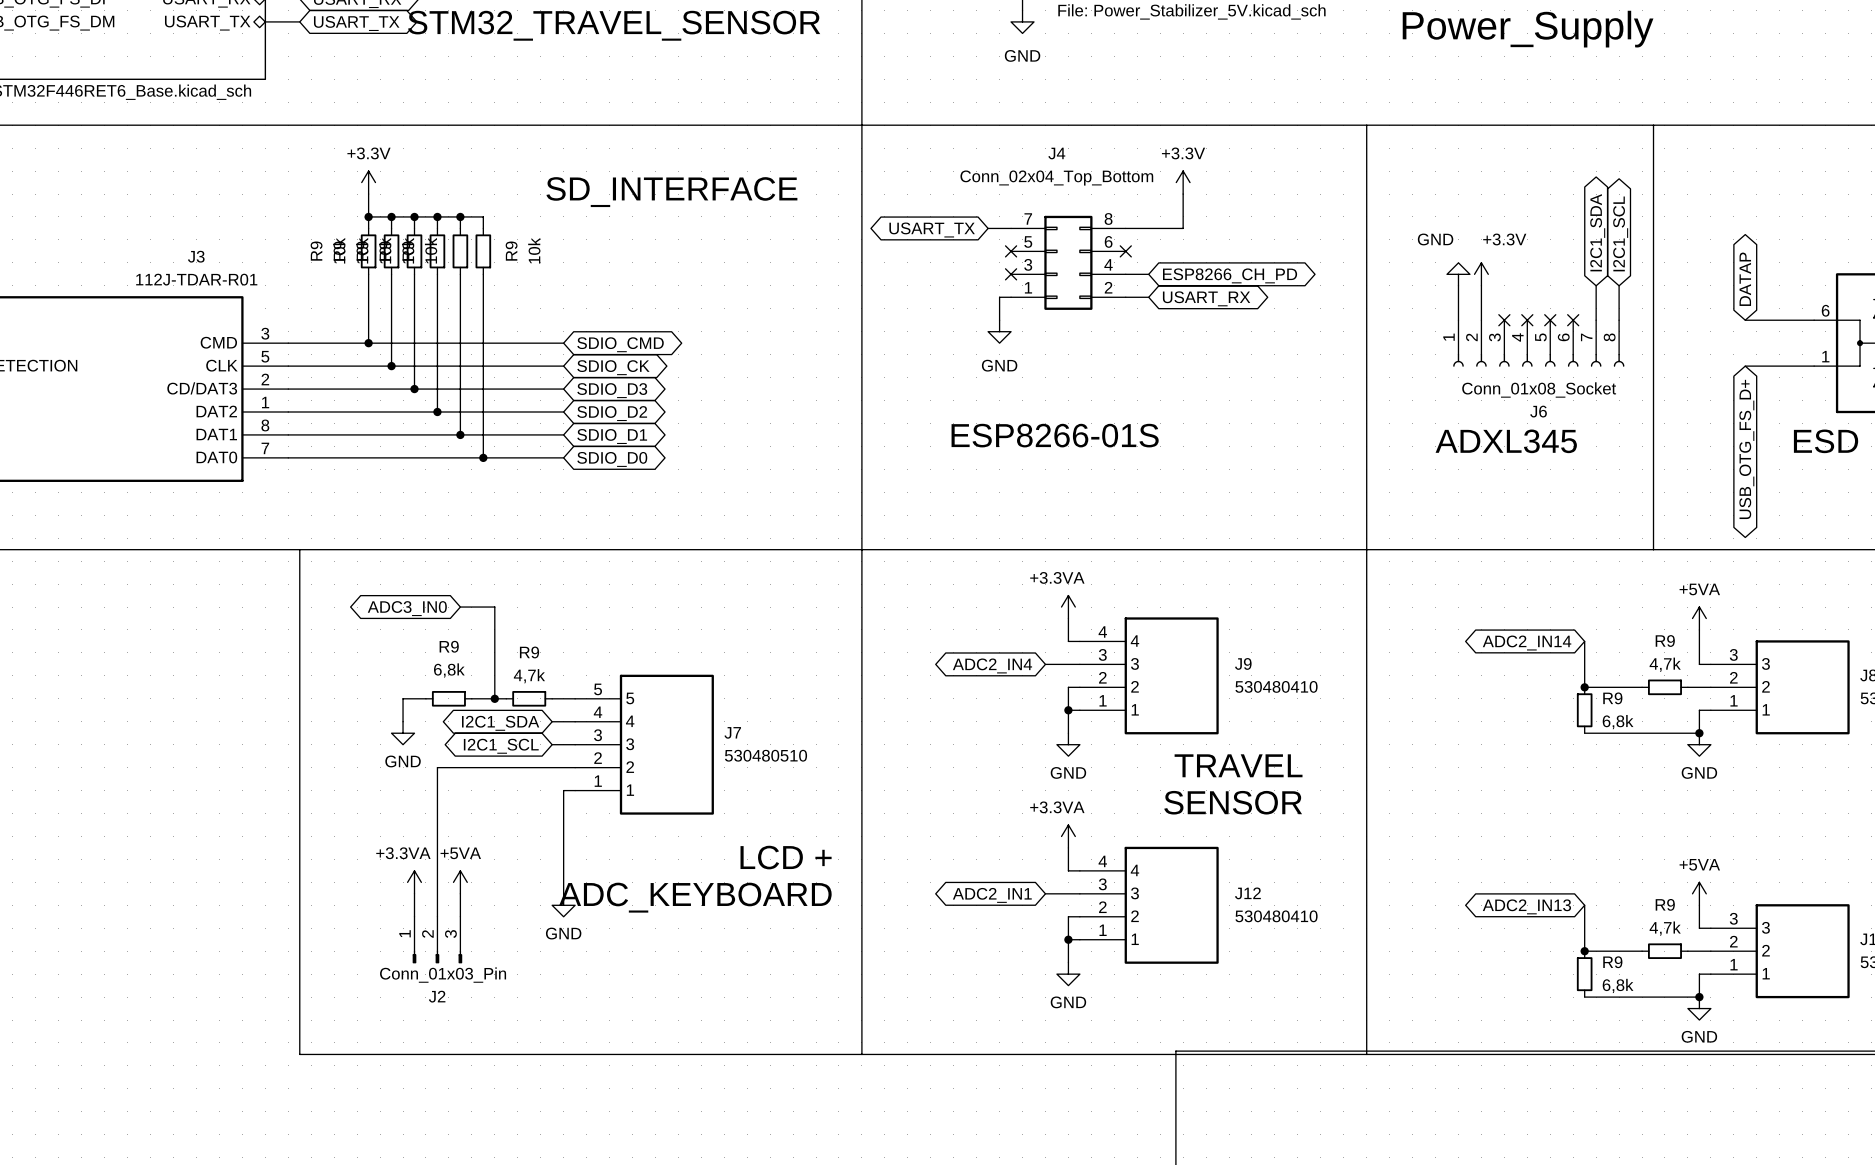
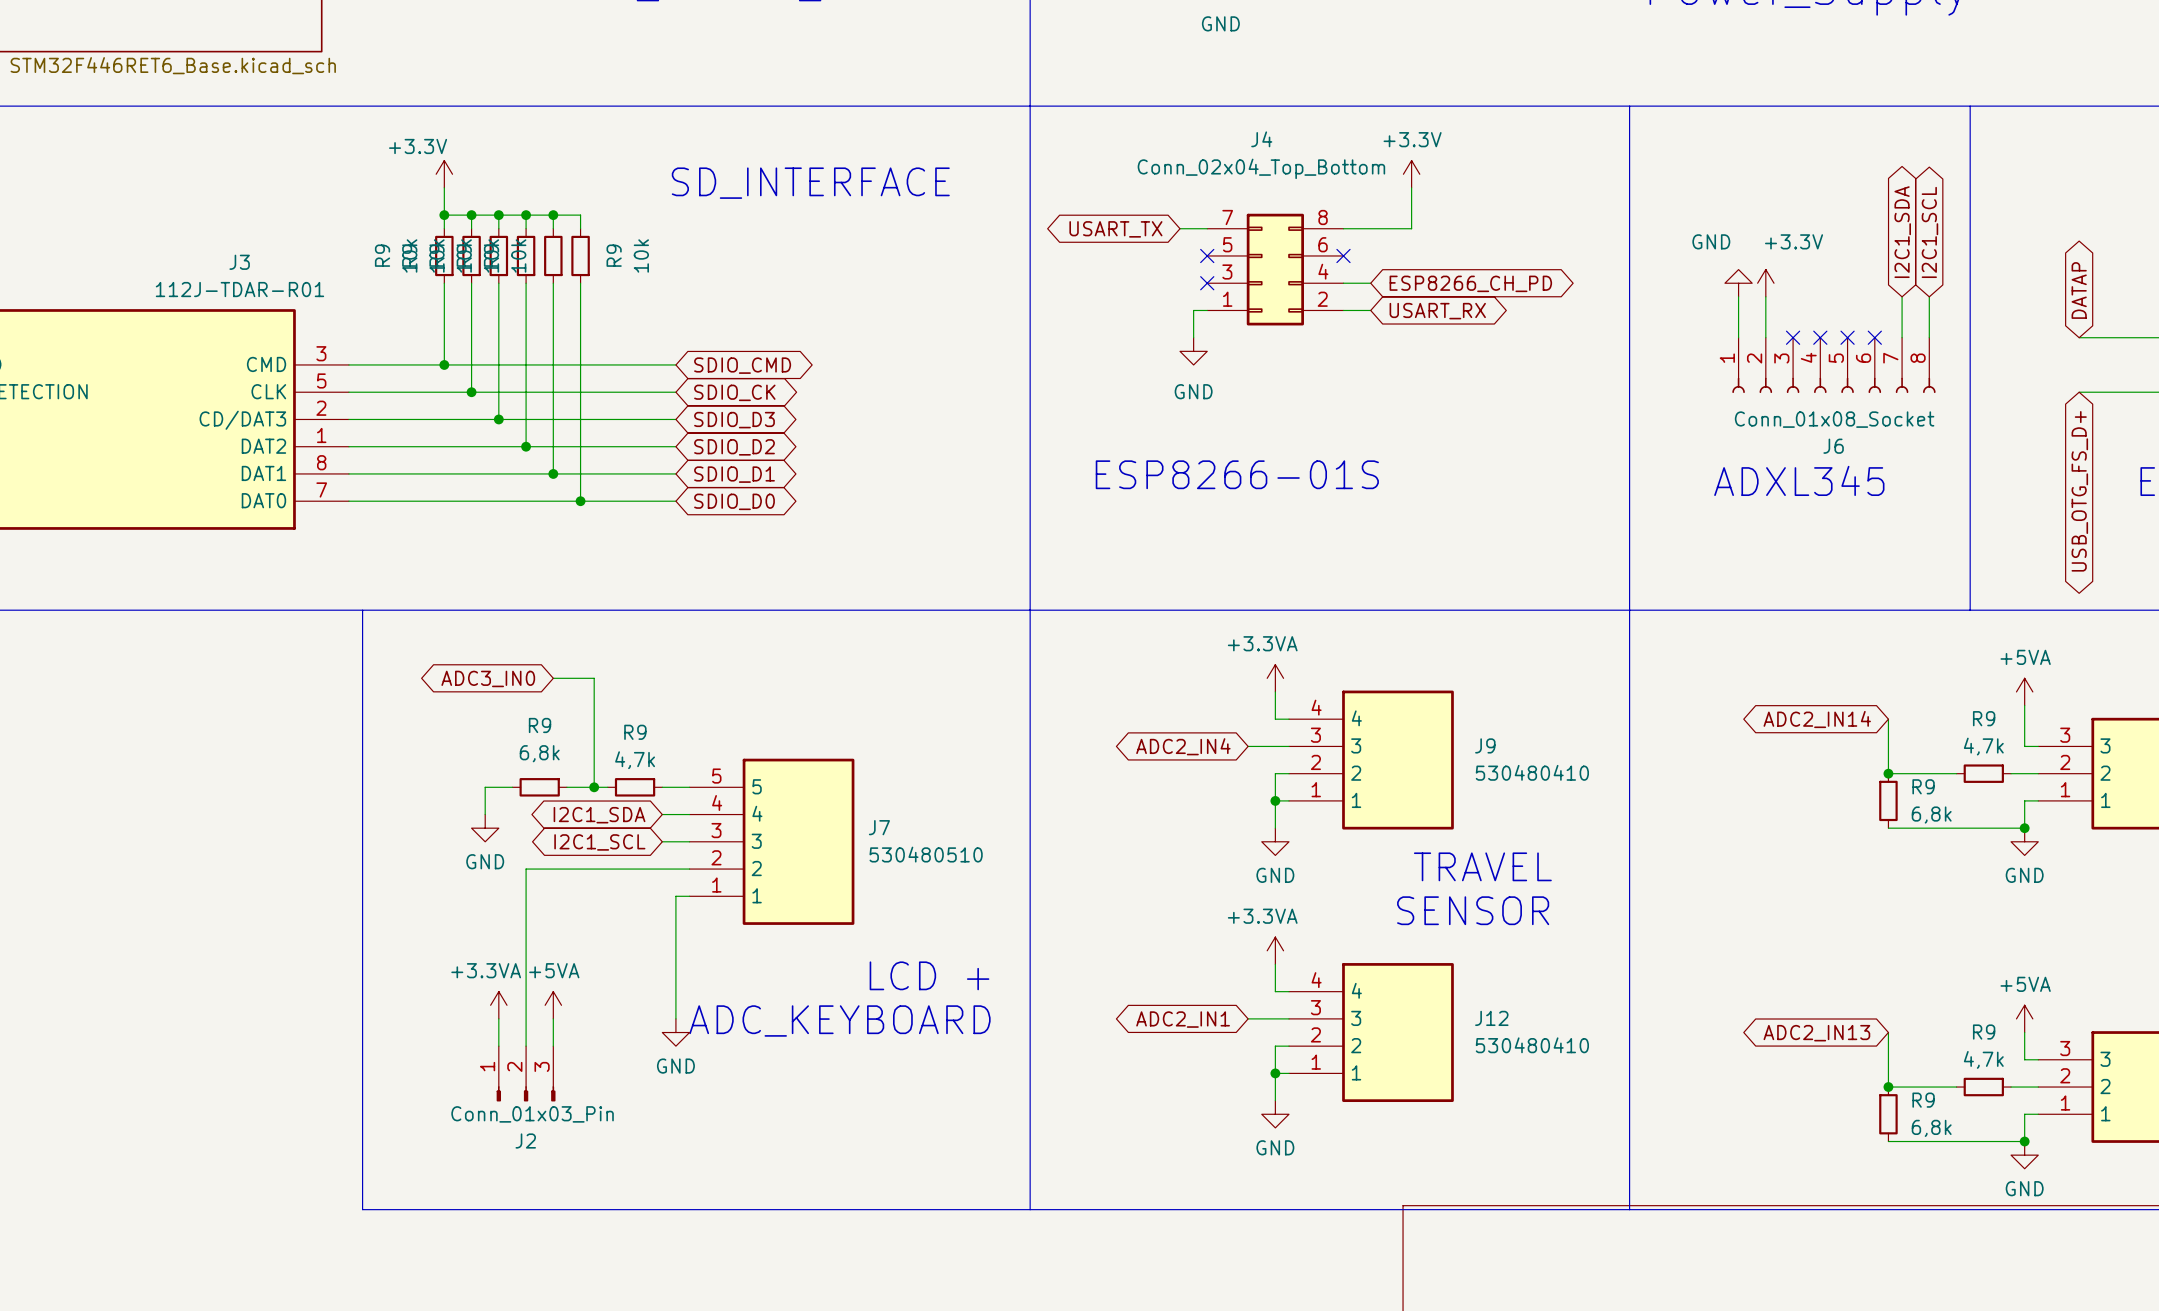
power symbol text position: +3.3V (368, 153) -> +3.3V (418, 146)

